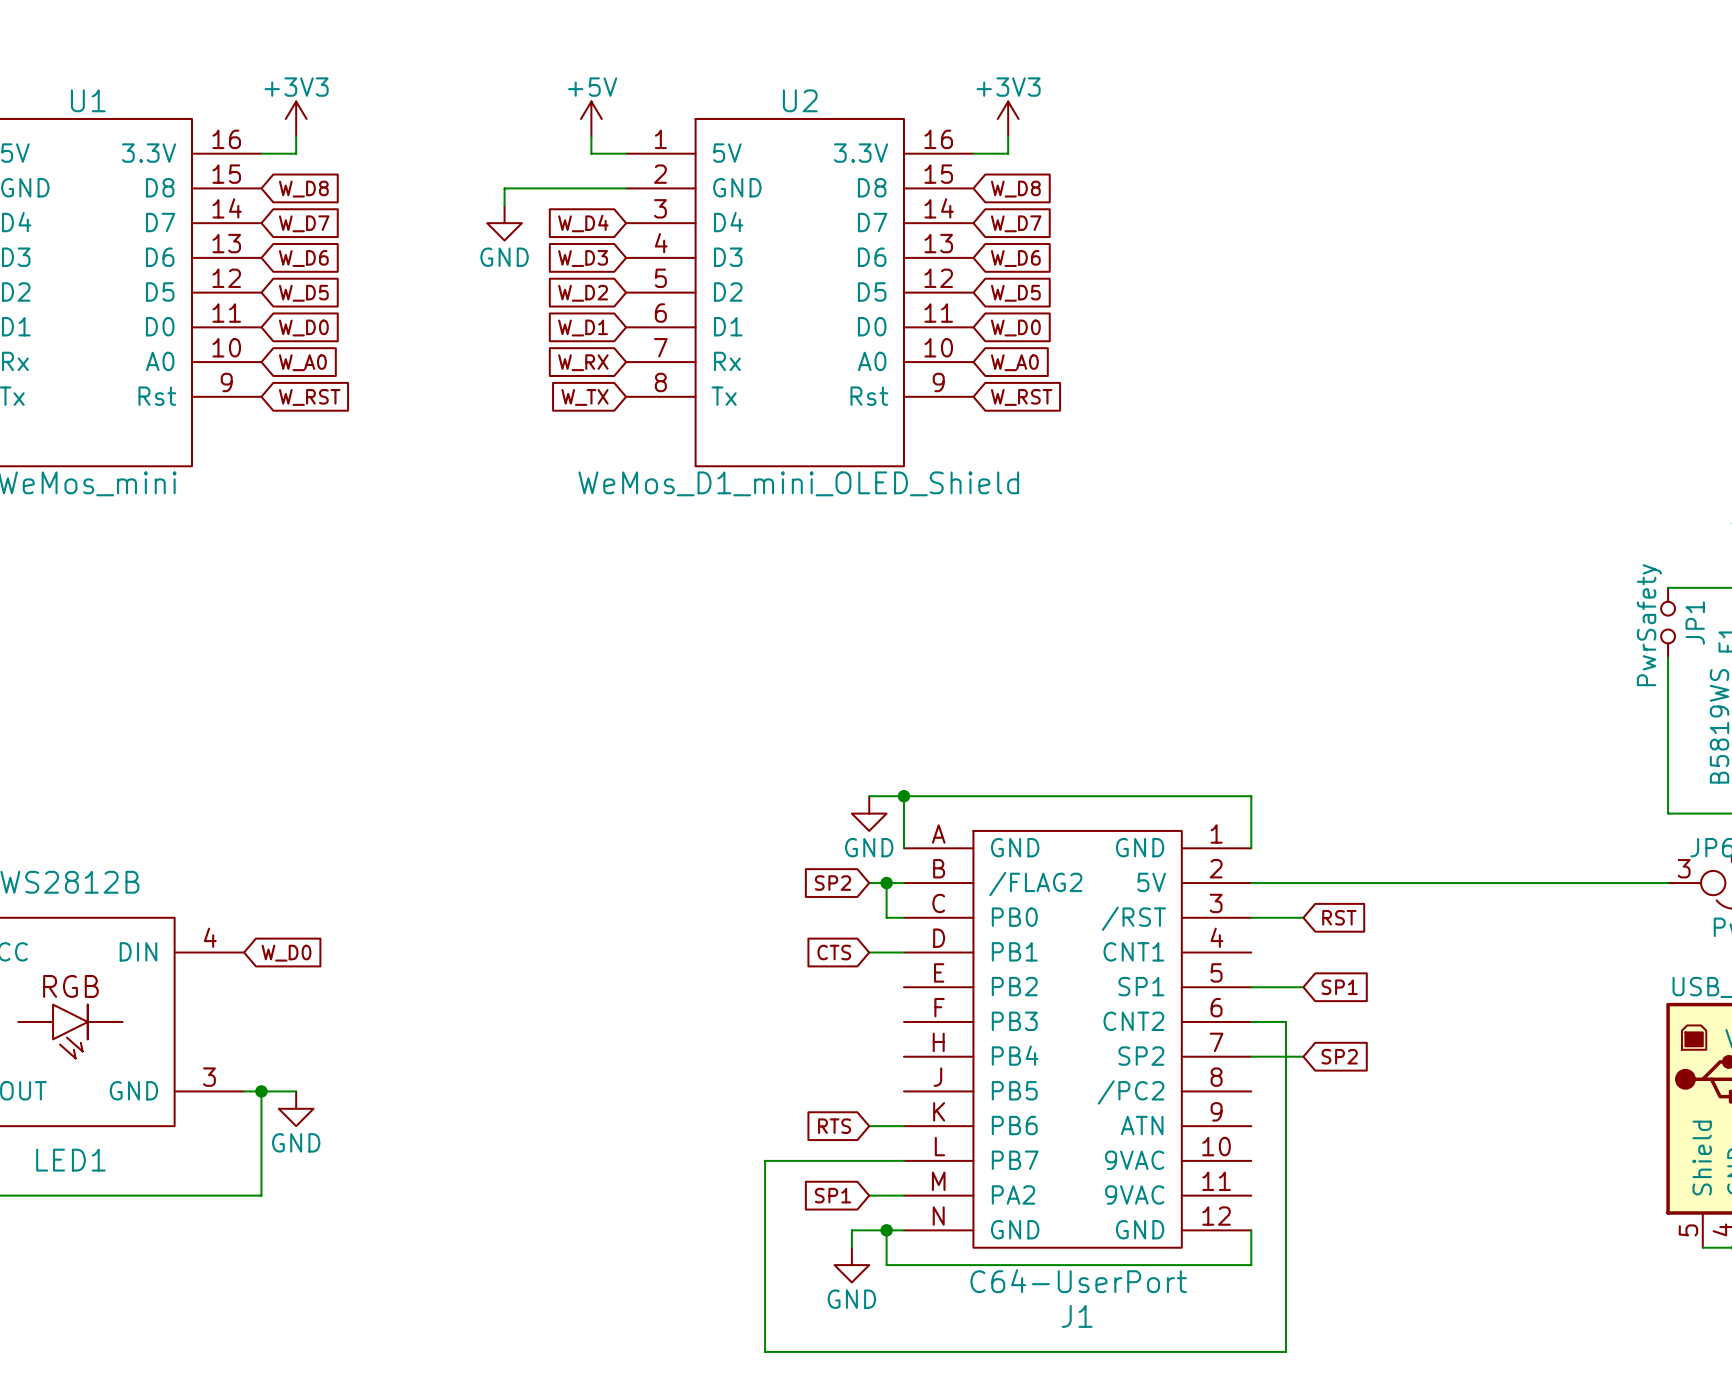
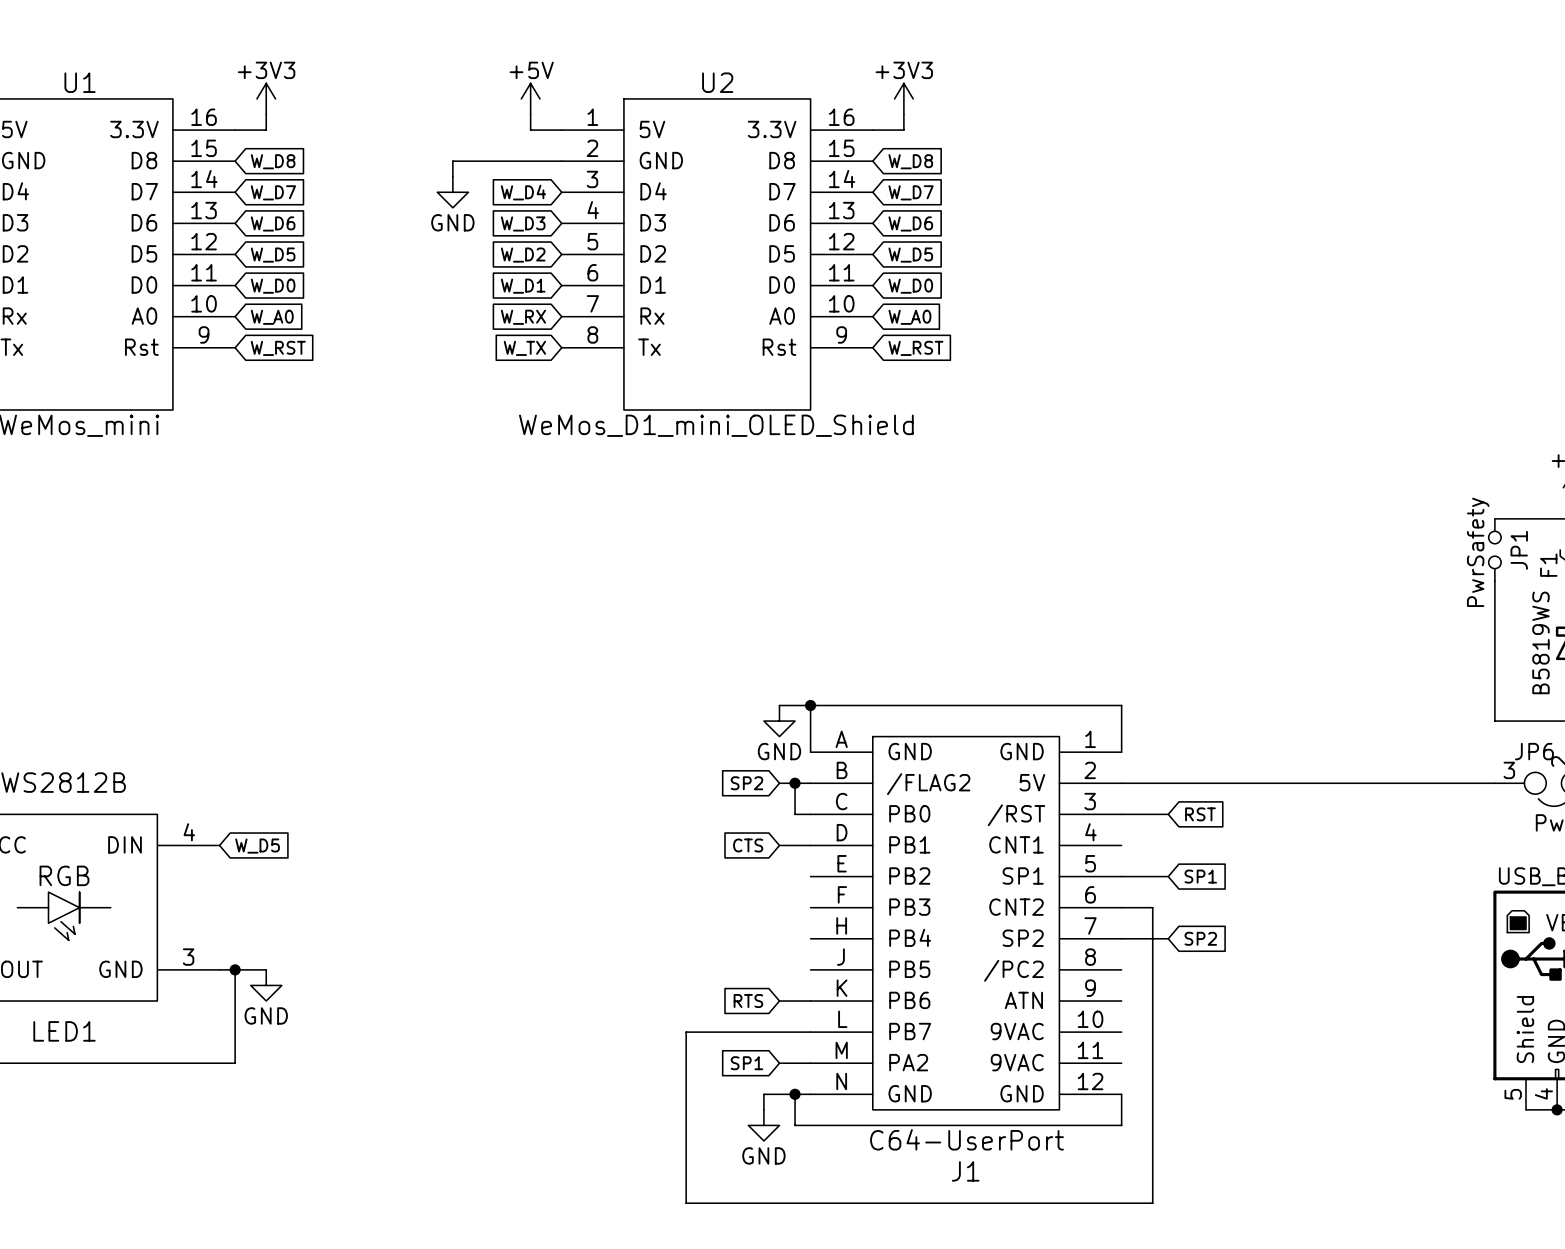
global label: W_D0 (286, 953) -> W_D5 (257, 846)

